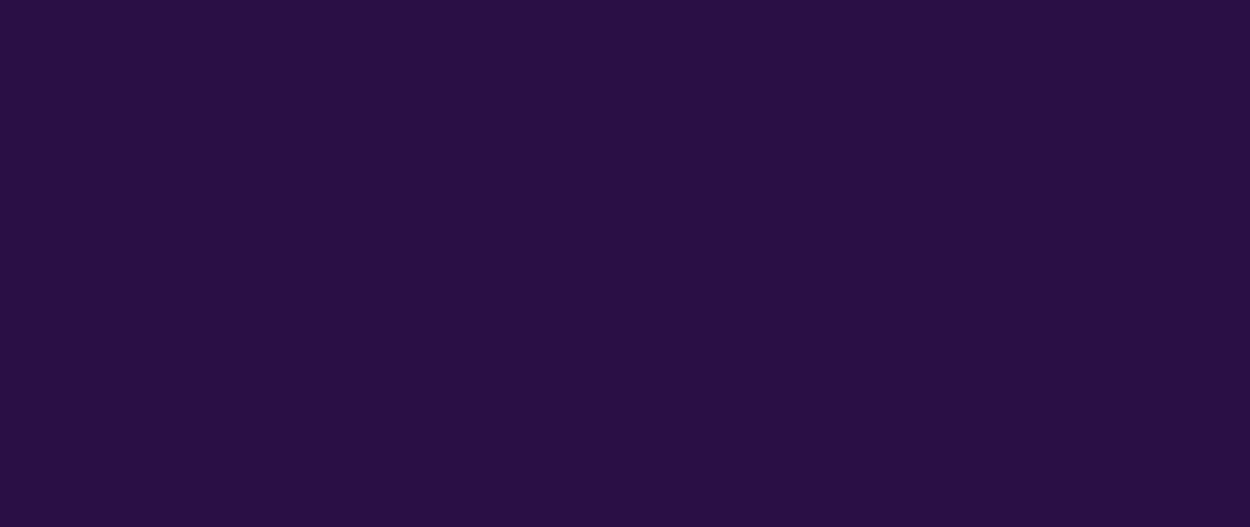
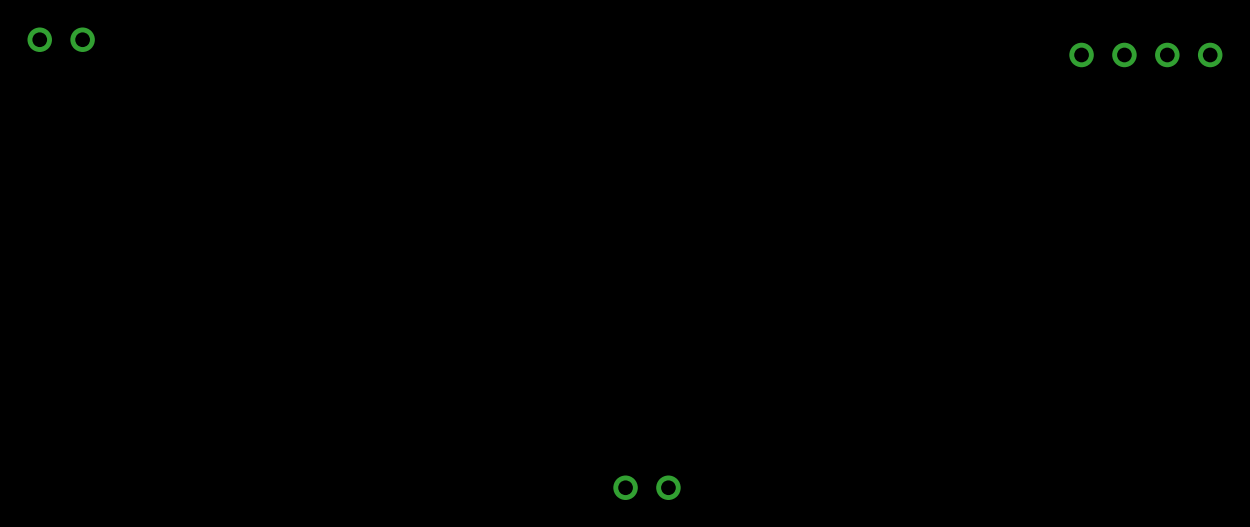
part: none -> (61, 39)
part: none -> (1145, 54)
part: none -> (647, 487)

